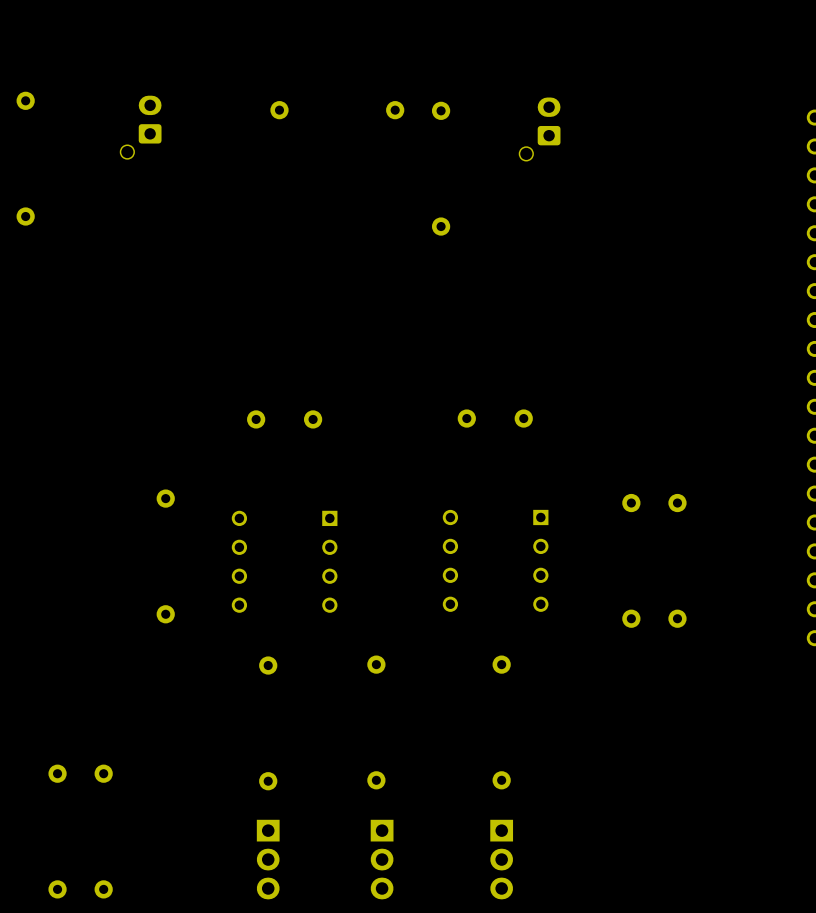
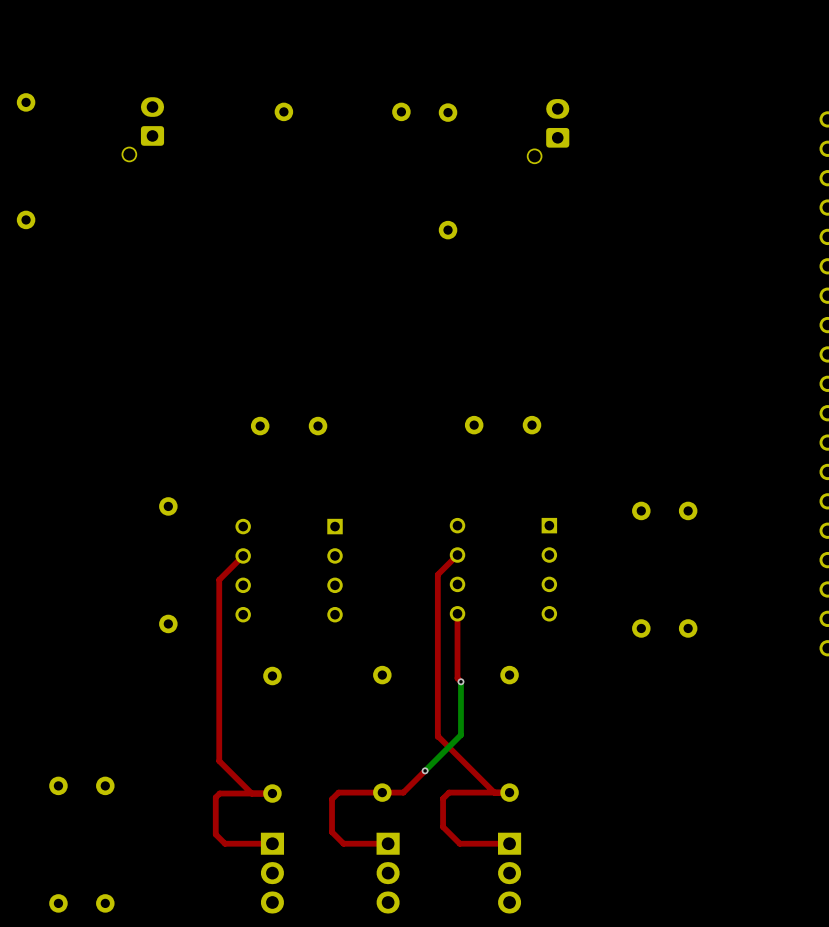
top track: none -> (457, 555) (437, 574) (437, 736) (494, 792)
top track: none -> (243, 555) (219, 579) (219, 761) (251, 793)
top track: none -> (457, 613) (457, 678) (460, 681)
bottom track: none -> (460, 681) (460, 735) (425, 770)
via: none -> (460, 681)
top track: none -> (425, 770) (403, 792) (338, 792) (332, 799) (332, 832) (343, 843) (388, 843)
via: none -> (425, 770)
top track: none -> (509, 792) (449, 792) (443, 798) (443, 826) (459, 843) (509, 843)
top track: none -> (272, 793) (219, 793) (215, 797) (215, 834) (225, 843) (272, 843)

